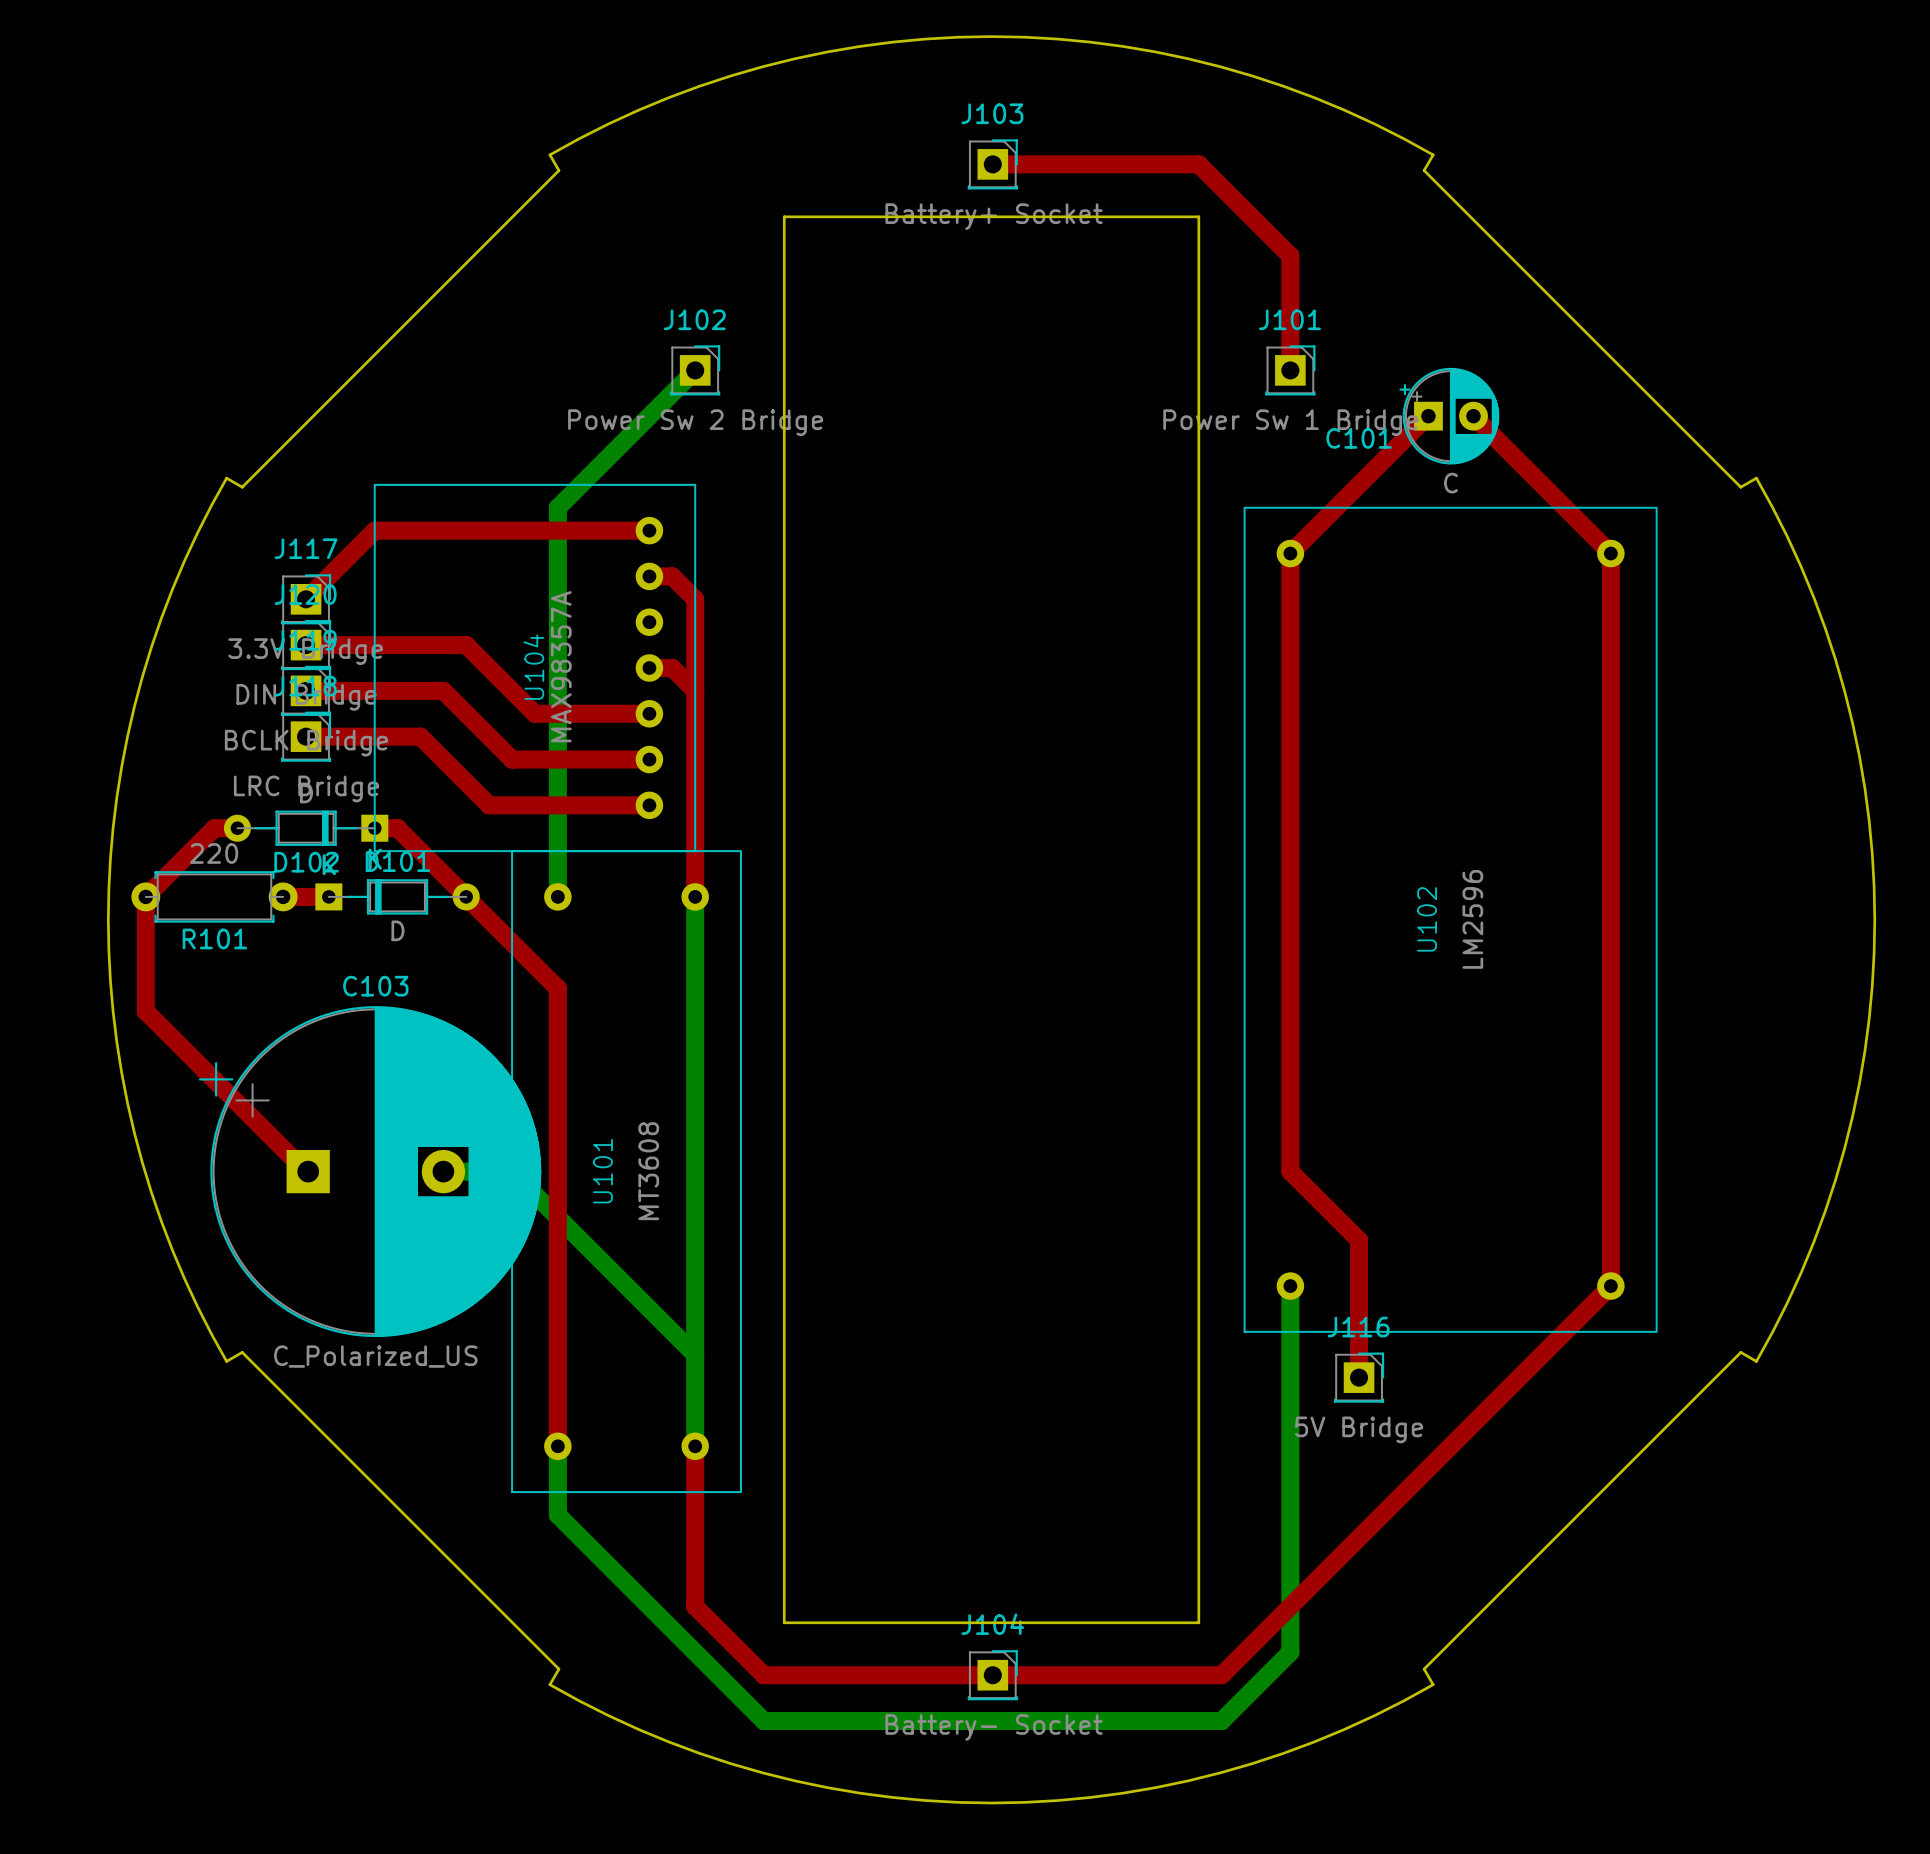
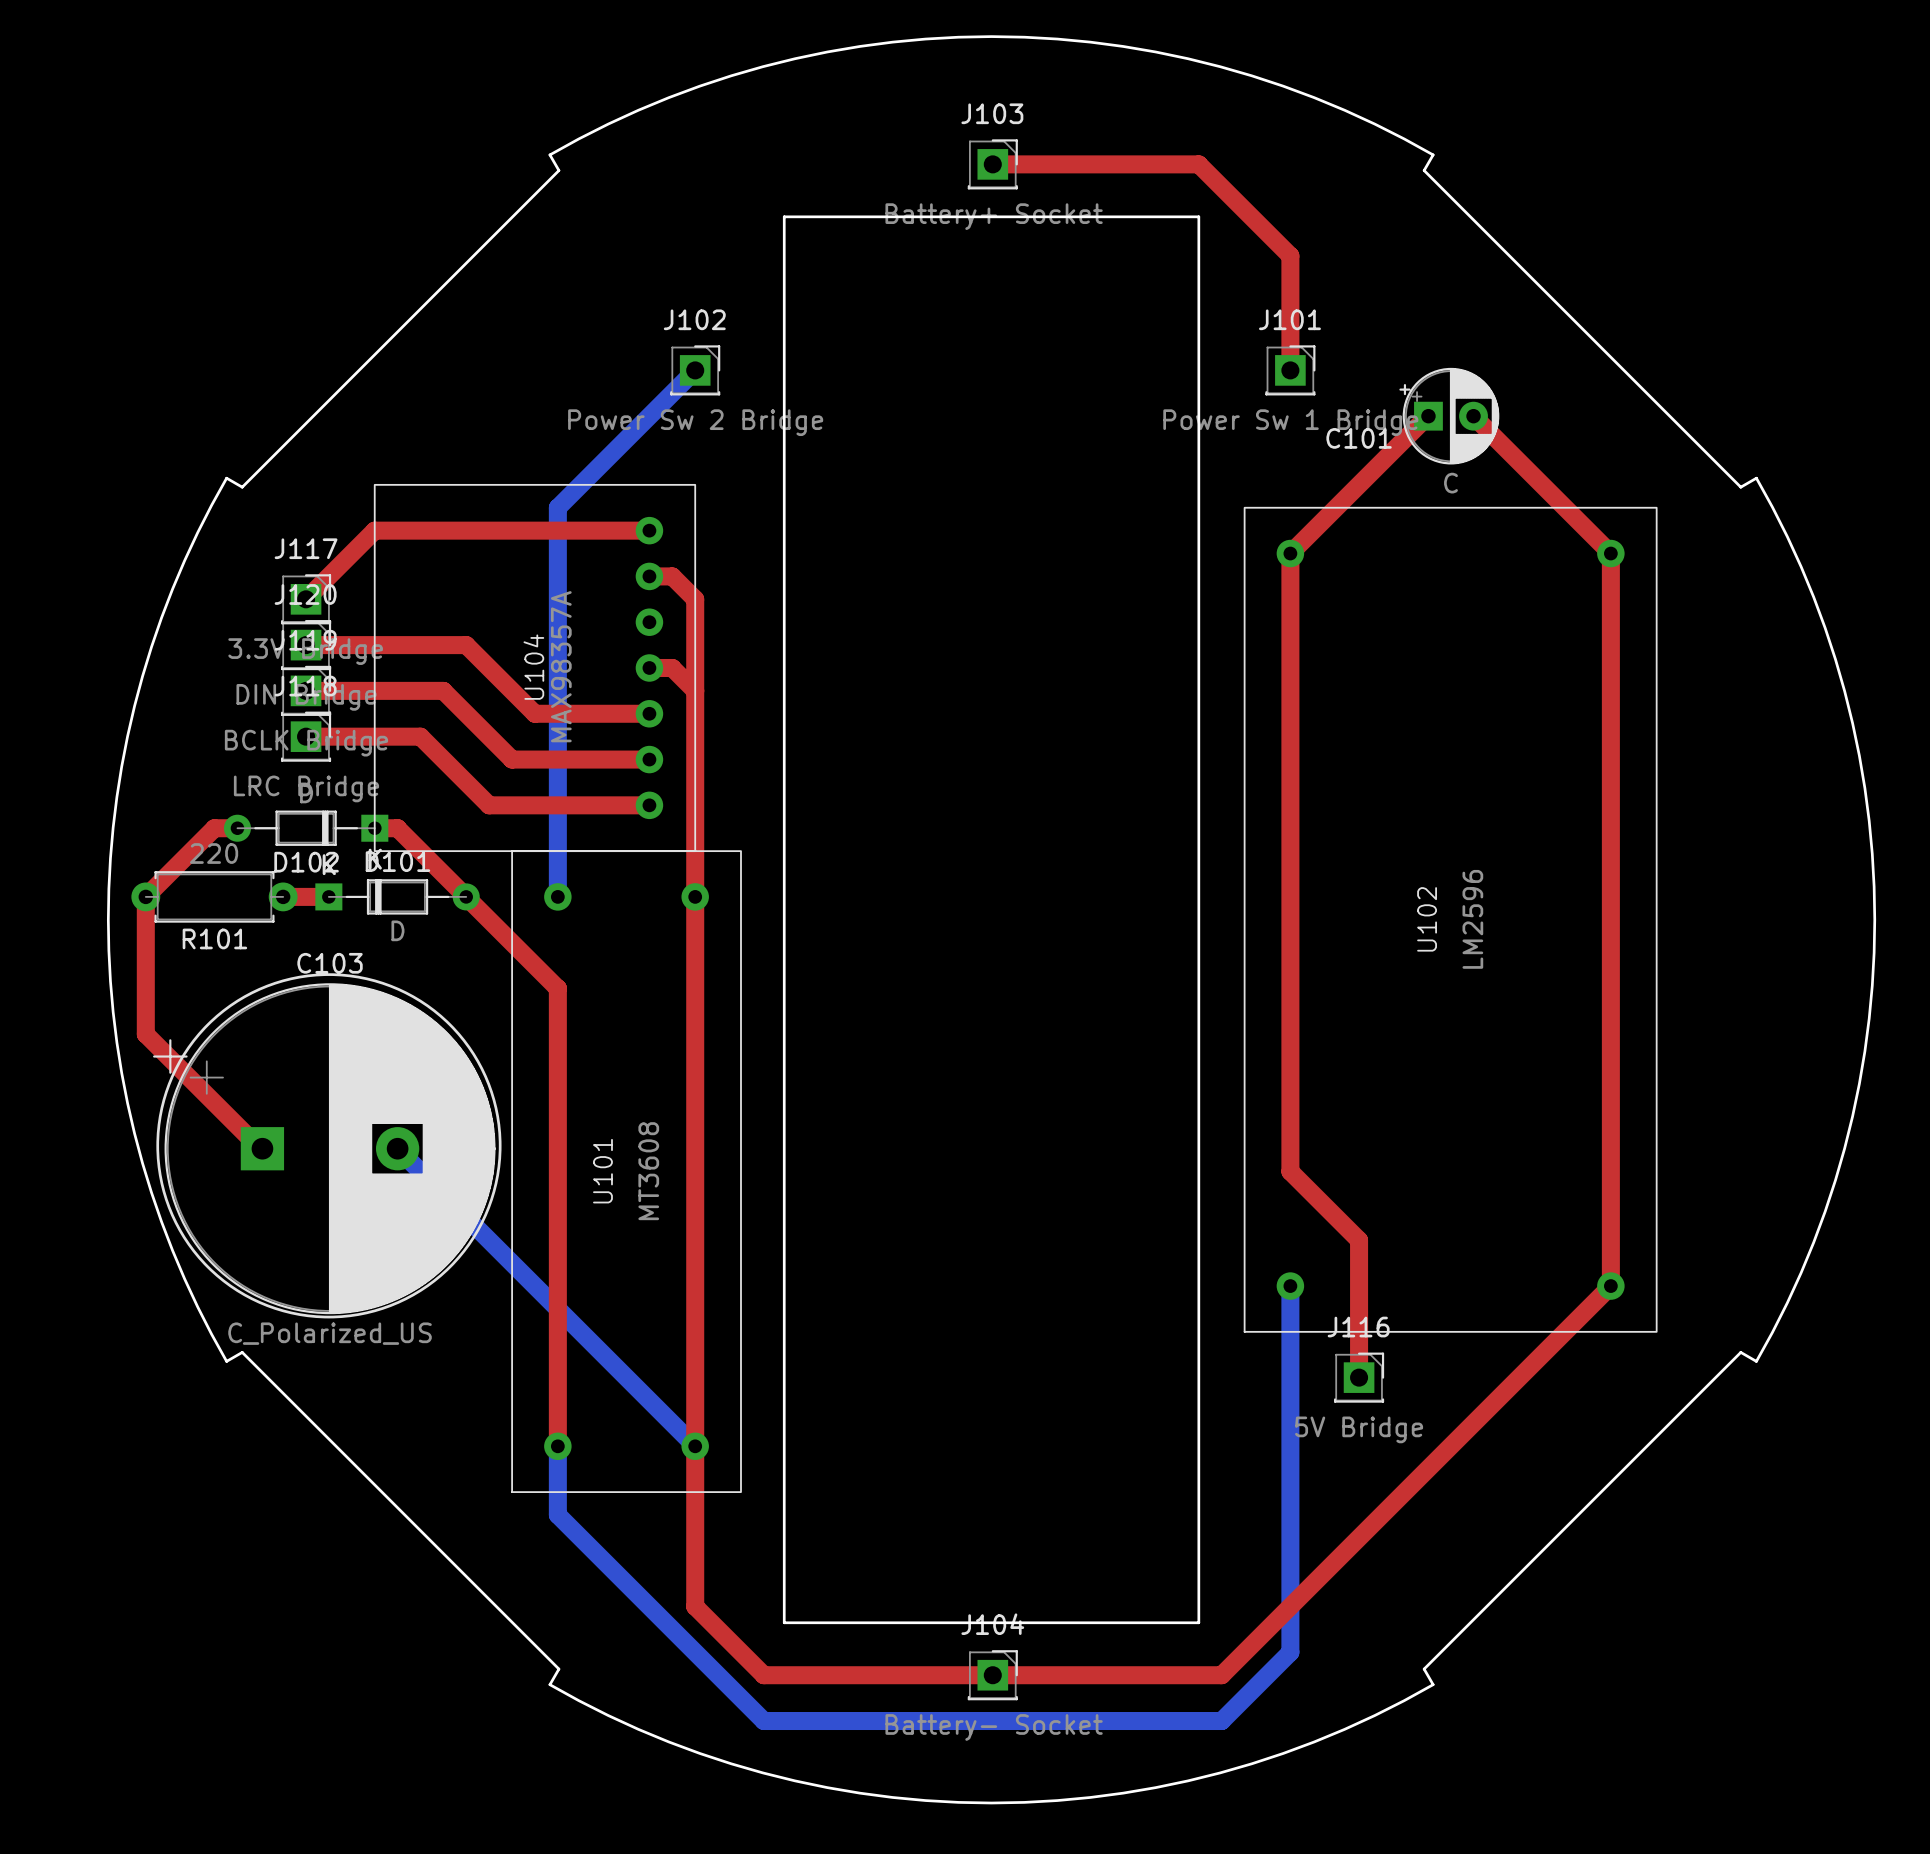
top track: none -> (695, 896) (695, 1446)
bottom track: (695, 896) (695, 1446) -> (397, 1148) (695, 1446)
drawing: none -> [156, 973, 502, 1319]
top track: (145, 1011) (306, 1171) (308, 1171) -> (145, 1011) (145, 1034) (260, 1148) (262, 1148)
C103 position: (370, 1171) -> (324, 1148)
bottom track: (443, 1171) (512, 1171) (695, 1354) -> none

